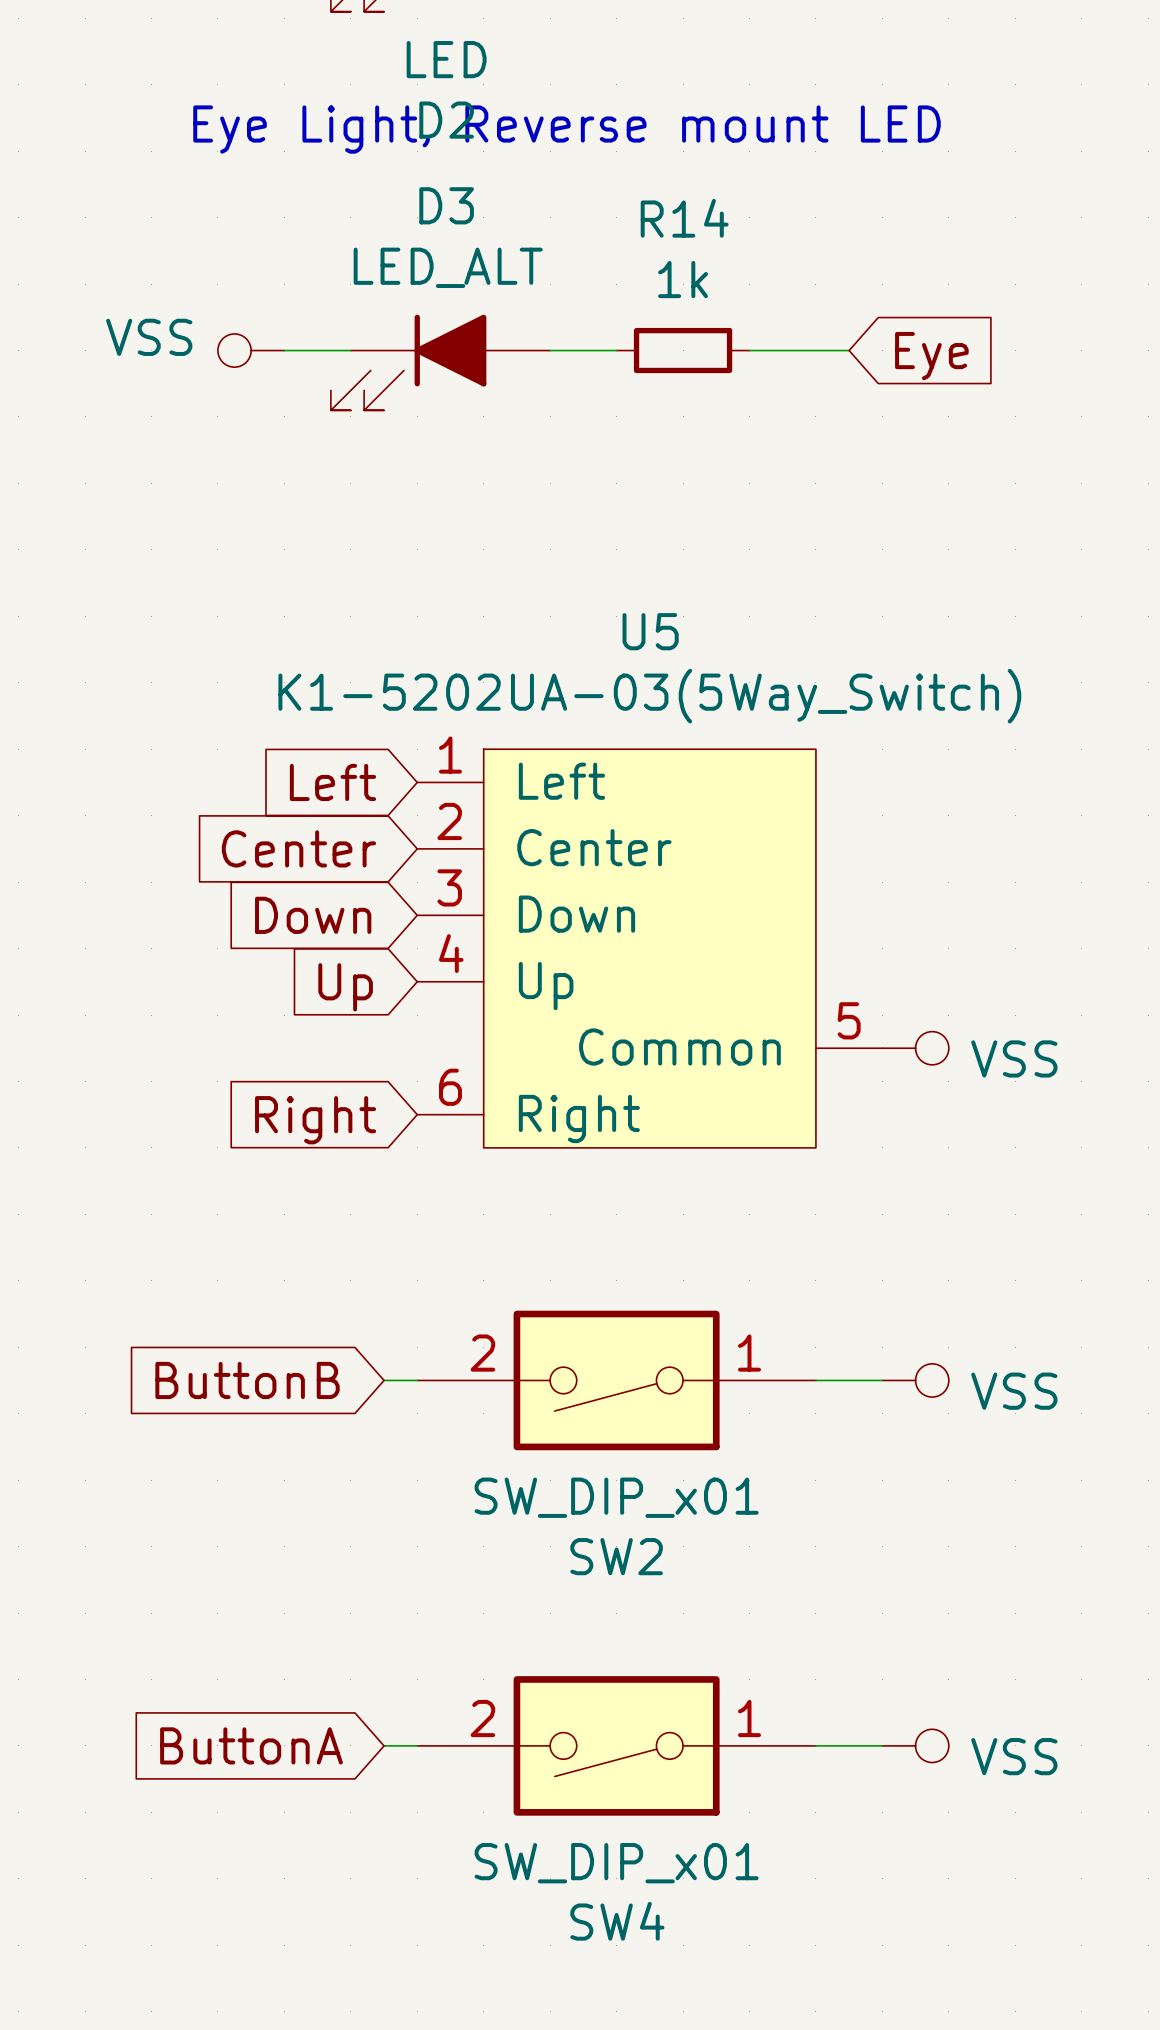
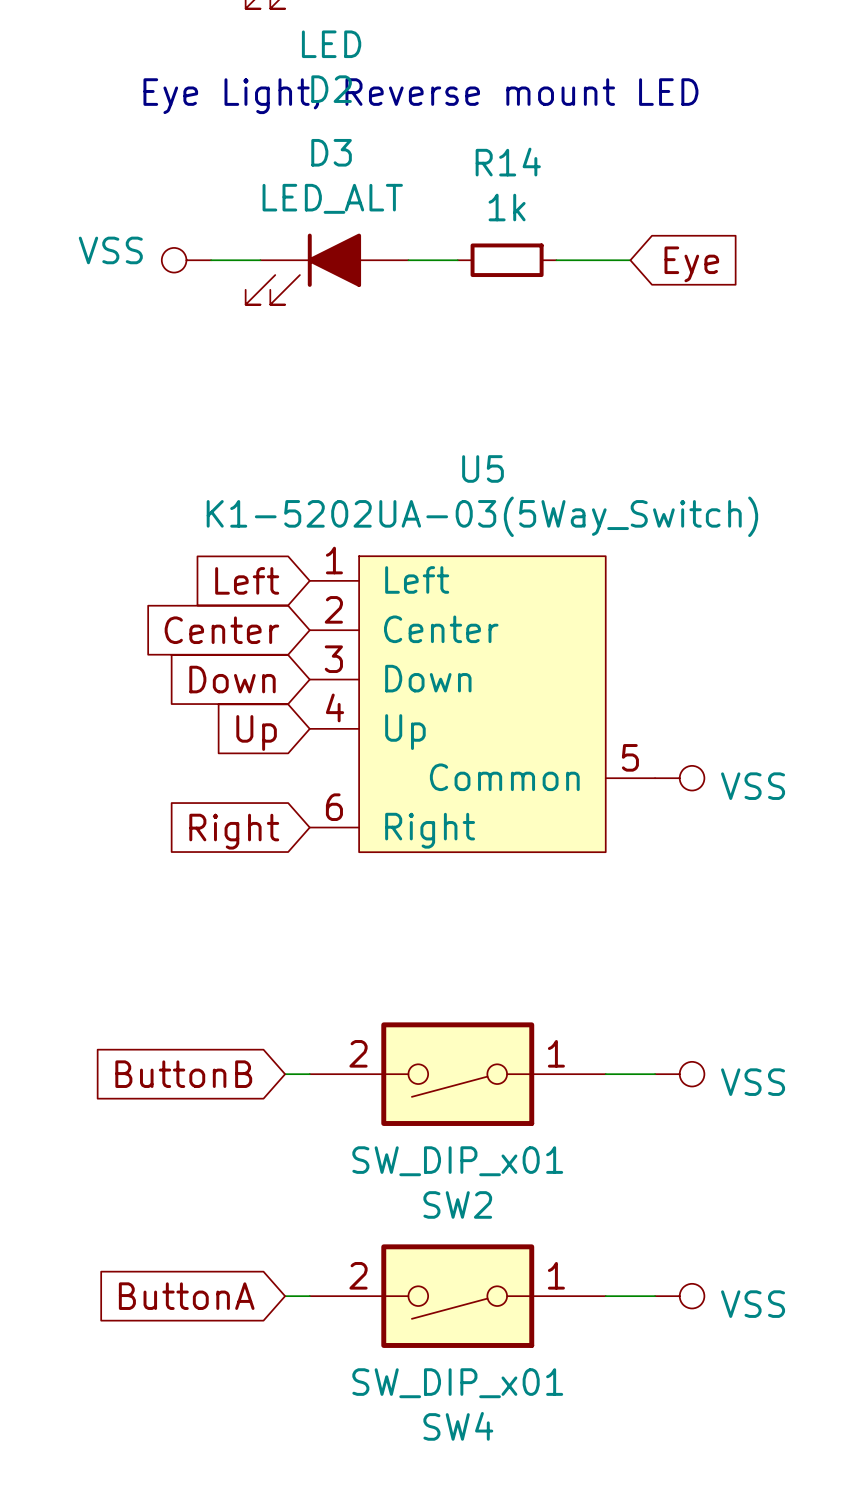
global label position: ButtonB (247, 1380) -> ButtonB (183, 1074)
wire: (384, 1380) (417, 1380) -> (285, 1074) (309, 1074)
SW2 position: (616, 1380) -> (457, 1074)
wire: (815, 1380) (882, 1380) -> (605, 1074) (655, 1074)
power symbol position: VSS (915, 1380) -> VSS (679, 1074)

